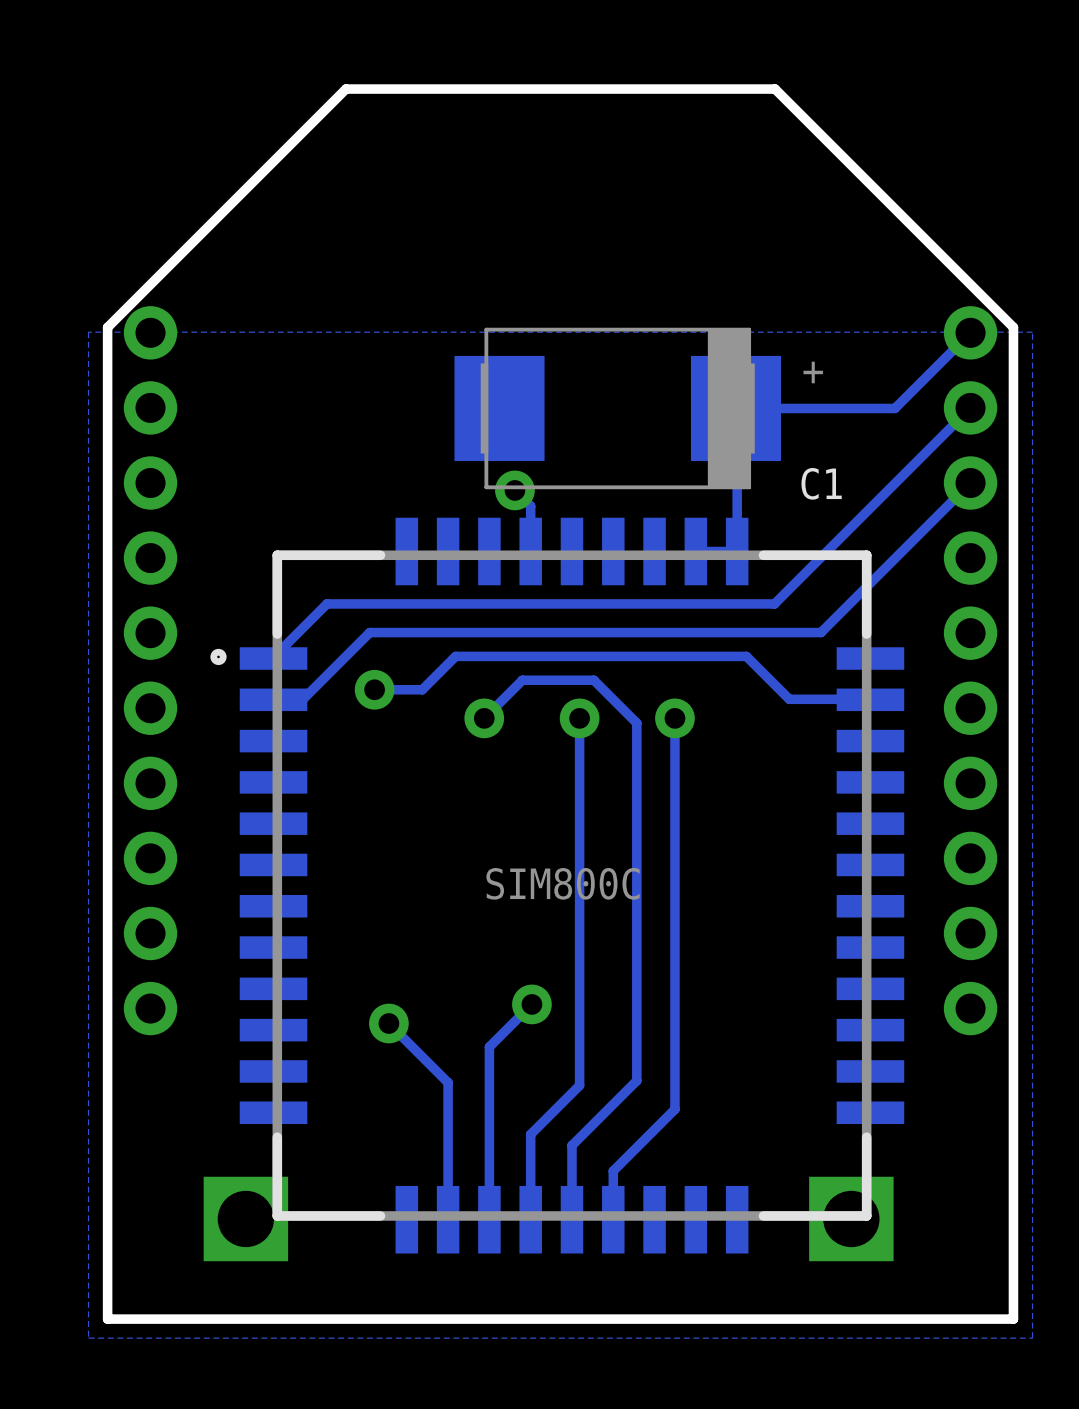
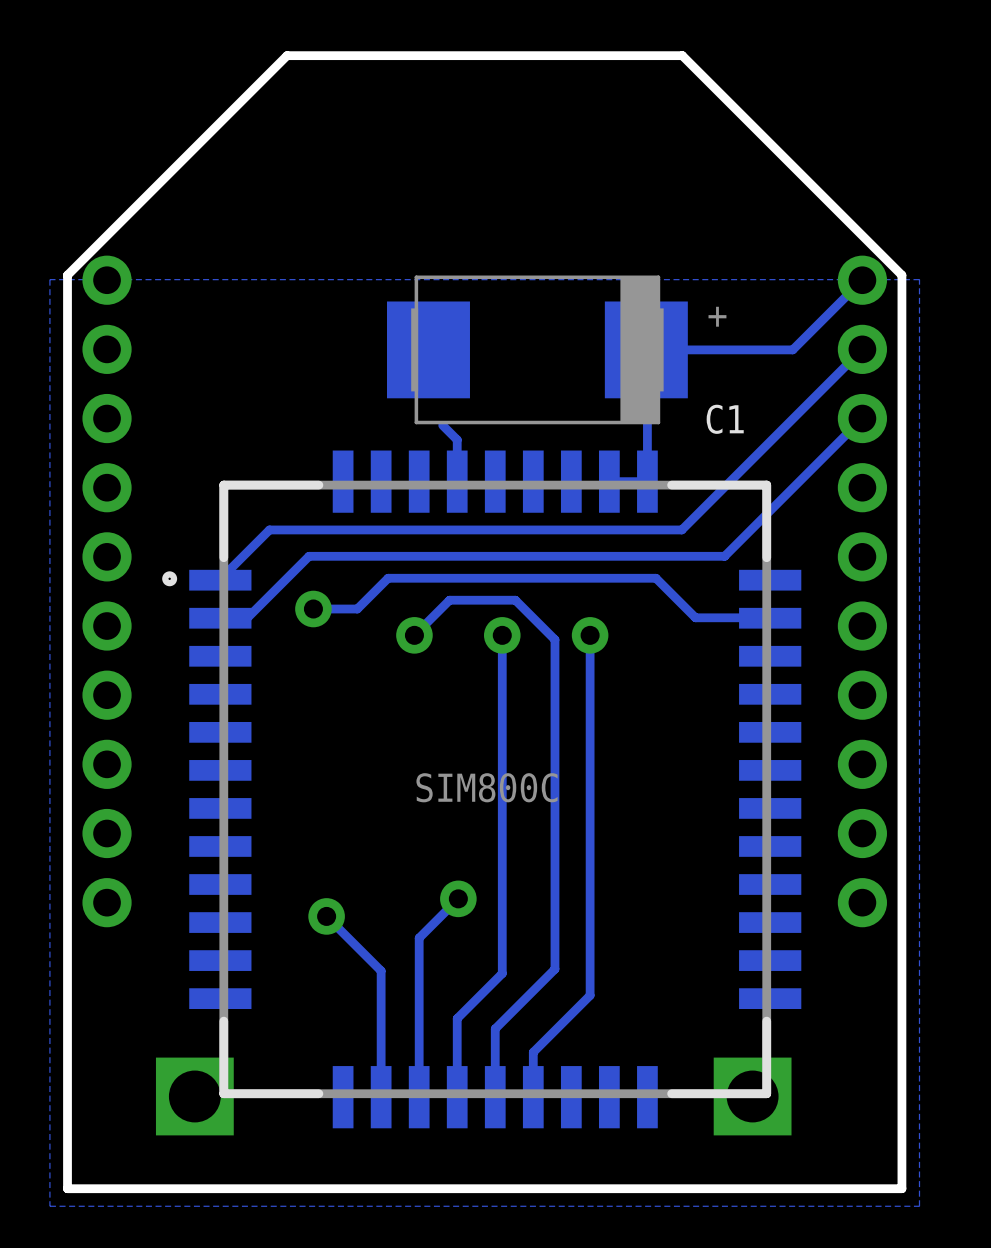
via: (514, 490) -> none

